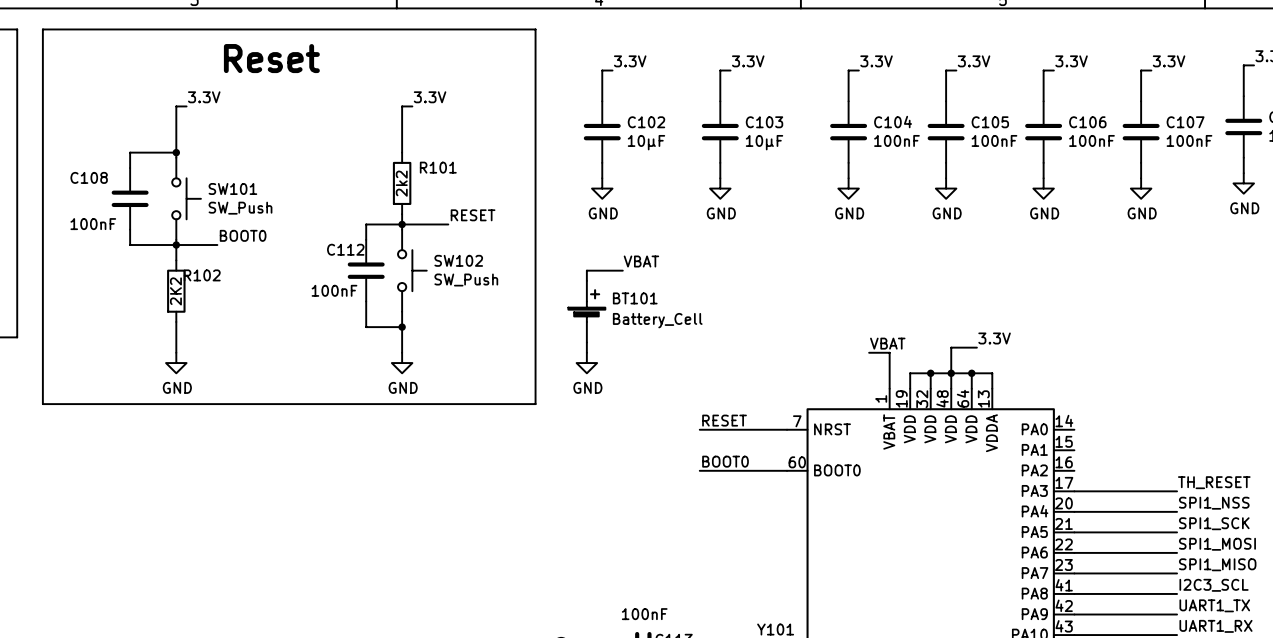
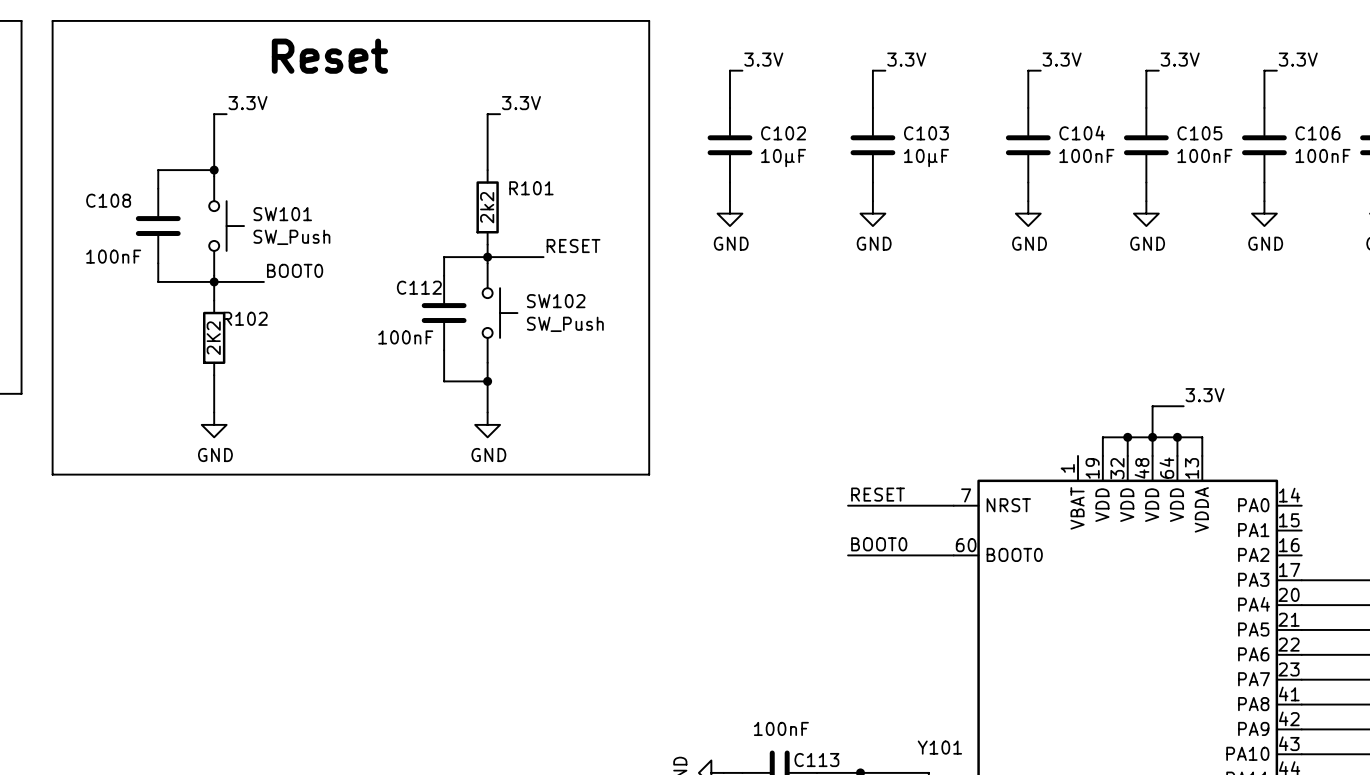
label: VBAT (641, 261) -> none
wire: (622, 270) (586, 270) (586, 280) -> none
BT101: Battery_Cell (586, 311) -> none
wire: (586, 342) (586, 352) -> none
label: VBAT (887, 343) -> none
wire: (869, 352) (889, 352) (889, 388) -> none
power symbol: GND (586, 363) -> none

